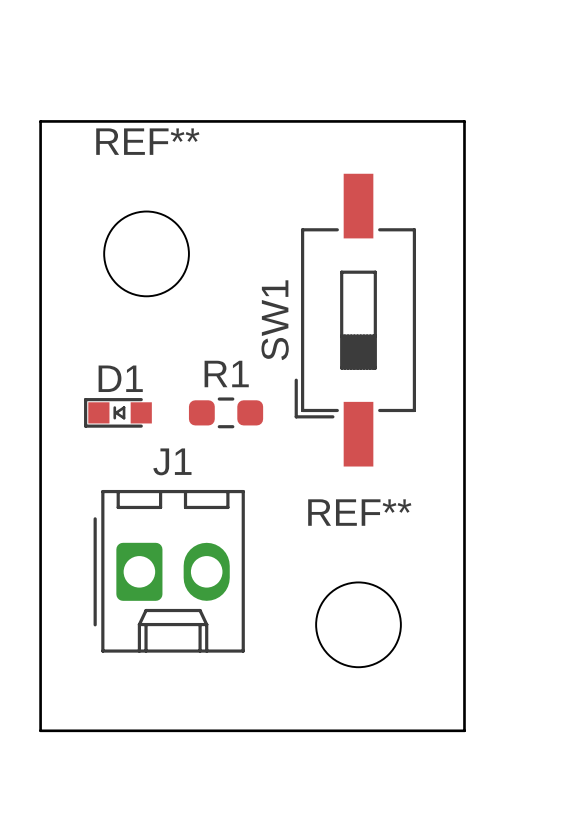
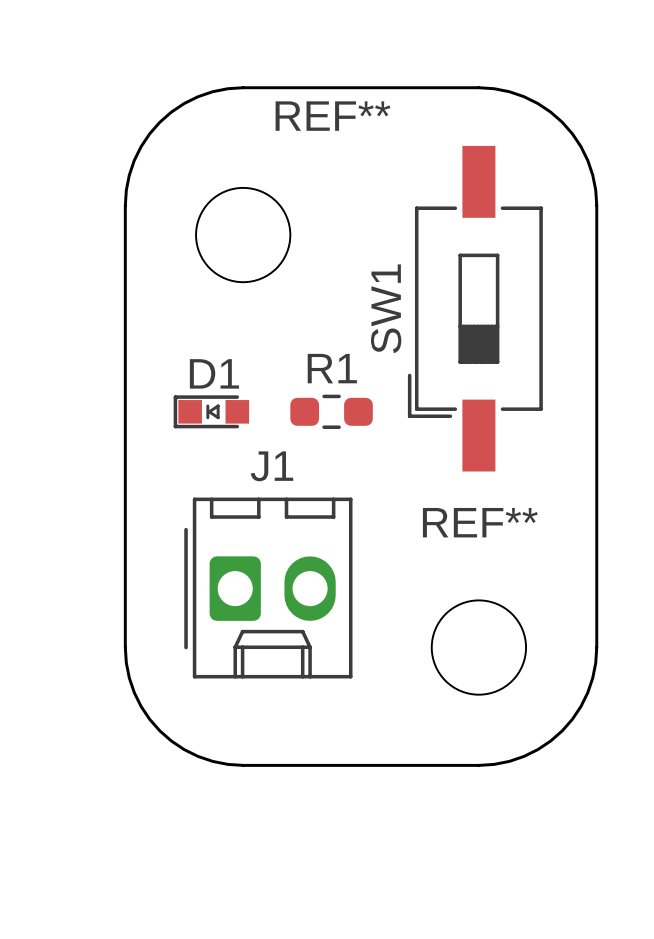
board edge: (146, 121) (40, 121) (40, 227) -> (243, 87) (212, 91) (198, 96) (171, 112) (159, 122) (141, 146) (134, 160) (129, 175) (125, 205)
board edge: (358, 121) (464, 121) (464, 227) -> (478, 87) (494, 88) (524, 96) (537, 103) (562, 122) (580, 146) (587, 160) (595, 190) (596, 205)
REF** name position: REF** (147, 141) -> REF** (333, 116)
board edge: (40, 624) (40, 730) (146, 730) -> (125, 647) (129, 678) (134, 692) (149, 719) (159, 730) (171, 741) (198, 756) (227, 764) (243, 765)
board edge: (464, 624) (464, 730) (358, 730) -> (596, 647) (592, 678) (587, 692) (580, 706) (562, 730) (537, 749) (524, 756) (494, 764) (478, 765)

